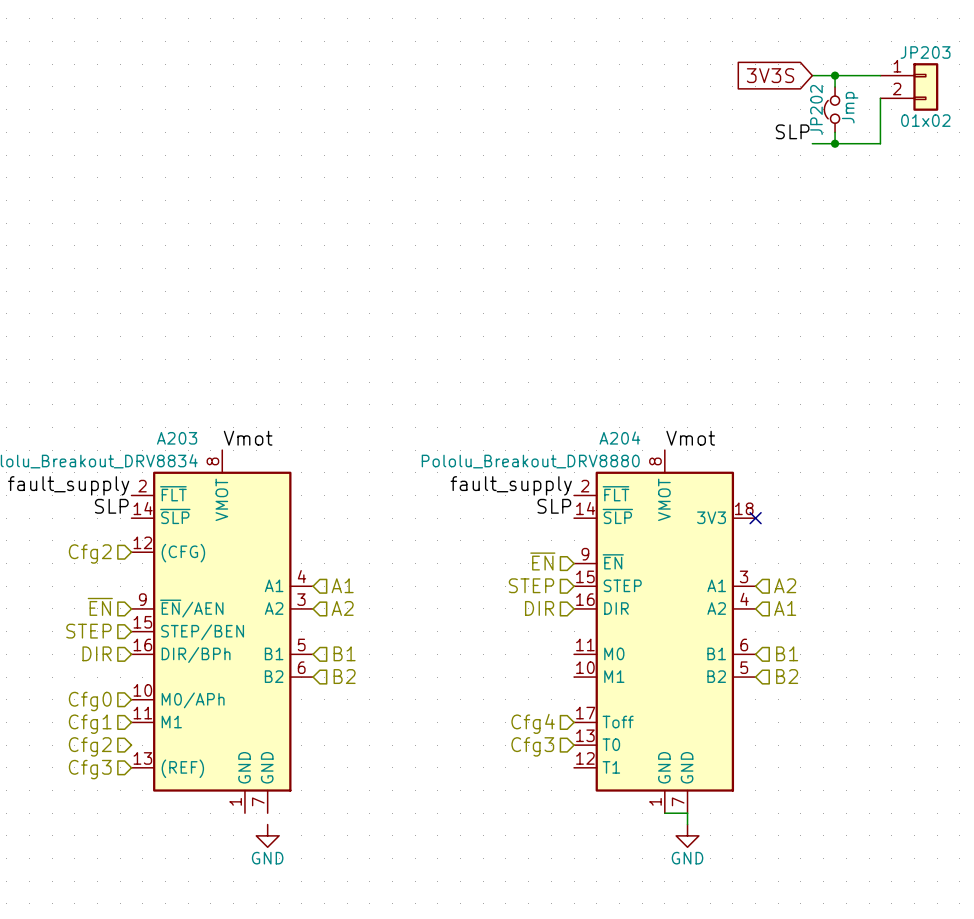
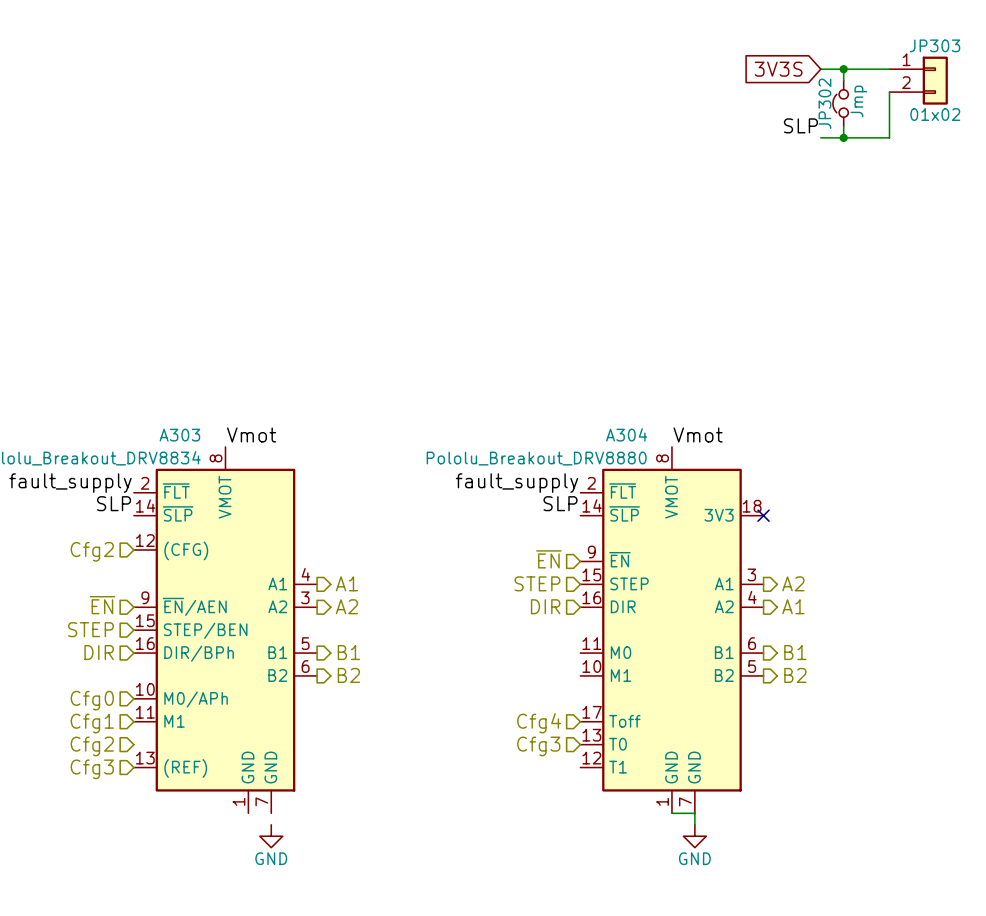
JP203 name: JP203 (925, 52) -> JP303 (935, 45)
JP202 name: JP202 (816, 109) -> JP302 (824, 103)
A203 name: A203 (177, 438) -> A303 (179, 435)
A204 name: A204 (619, 438) -> A304 (626, 434)
hierarchical label shape: input (342, 585) -> output (346, 583)
hierarchical label shape: input (785, 585) -> output (793, 583)
hierarchical label shape: input (342, 608) -> output (346, 606)
hierarchical label shape: input (785, 608) -> output (793, 606)
hierarchical label shape: input (344, 653) -> output (348, 652)
hierarchical label shape: input (787, 653) -> output (795, 652)
hierarchical label shape: input (344, 676) -> output (348, 675)
hierarchical label shape: input (787, 676) -> output (795, 675)

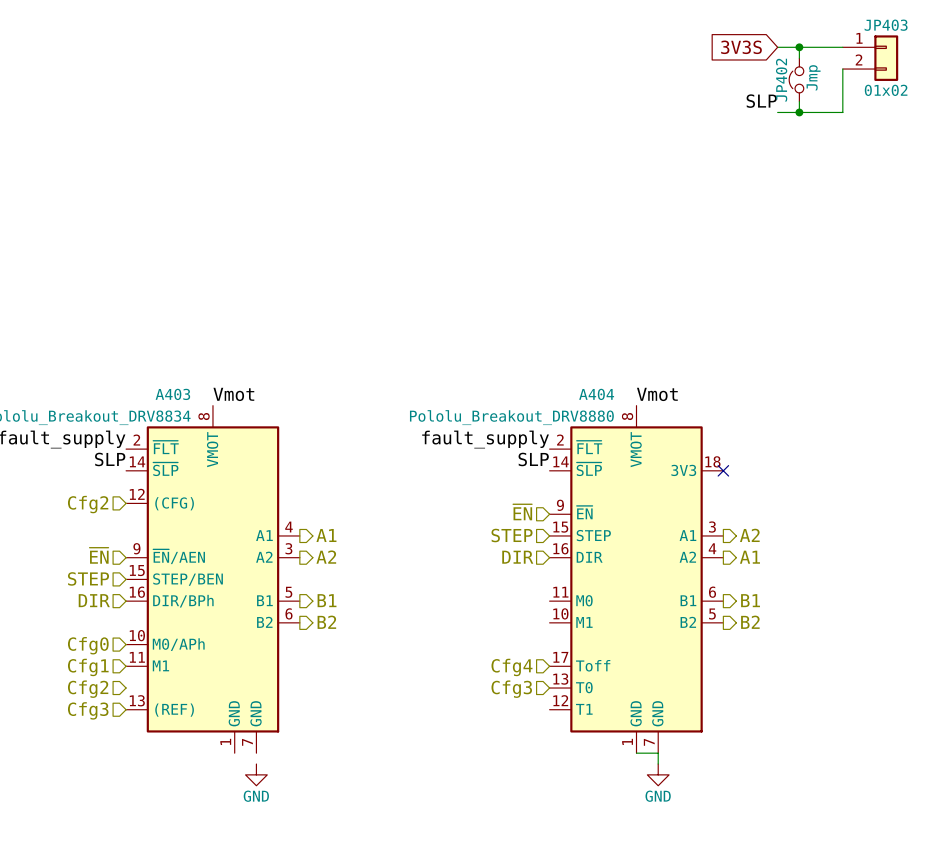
JP303 name: JP303 (935, 45) -> JP403 (886, 25)
JP302 name: JP302 (824, 103) -> JP402 (781, 80)
A304 name: A304 (626, 434) -> A404 (596, 394)
A303 name: A303 (179, 435) -> A403 (172, 394)

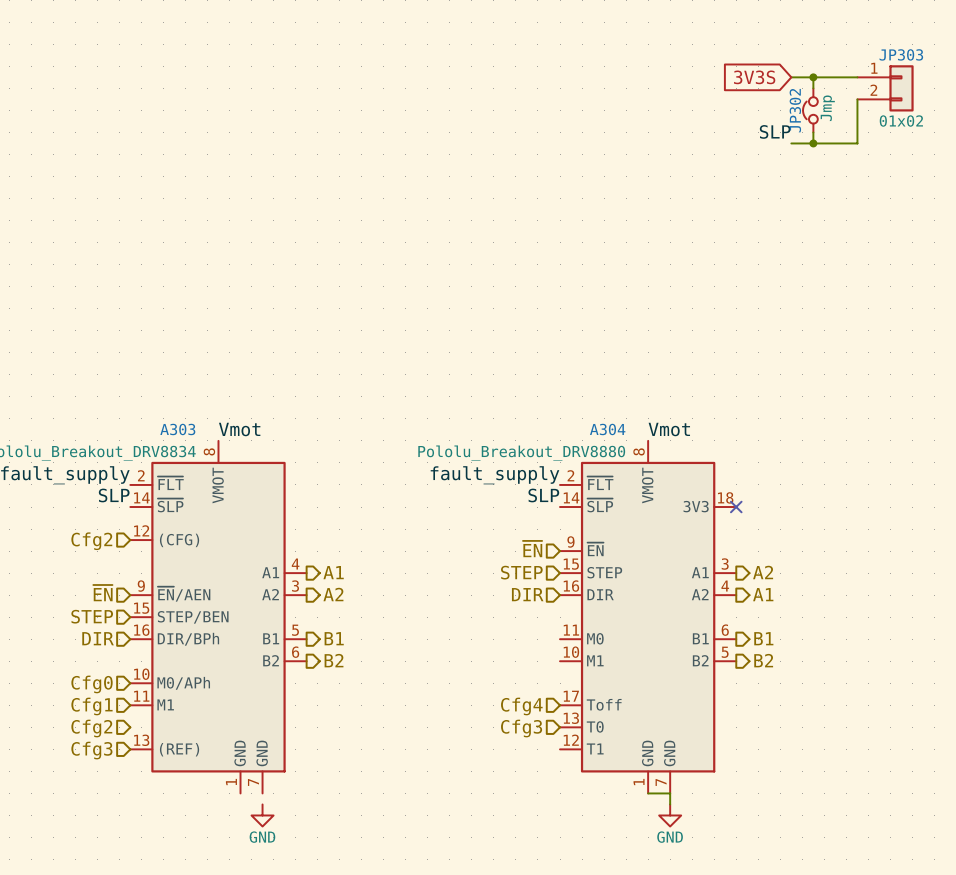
JP403 name: JP403 (886, 25) -> JP303 (901, 54)
JP402 name: JP402 (781, 80) -> JP302 (795, 110)
A403 name: A403 (172, 394) -> A303 (177, 429)
A404 name: A404 (596, 394) -> A304 (607, 429)

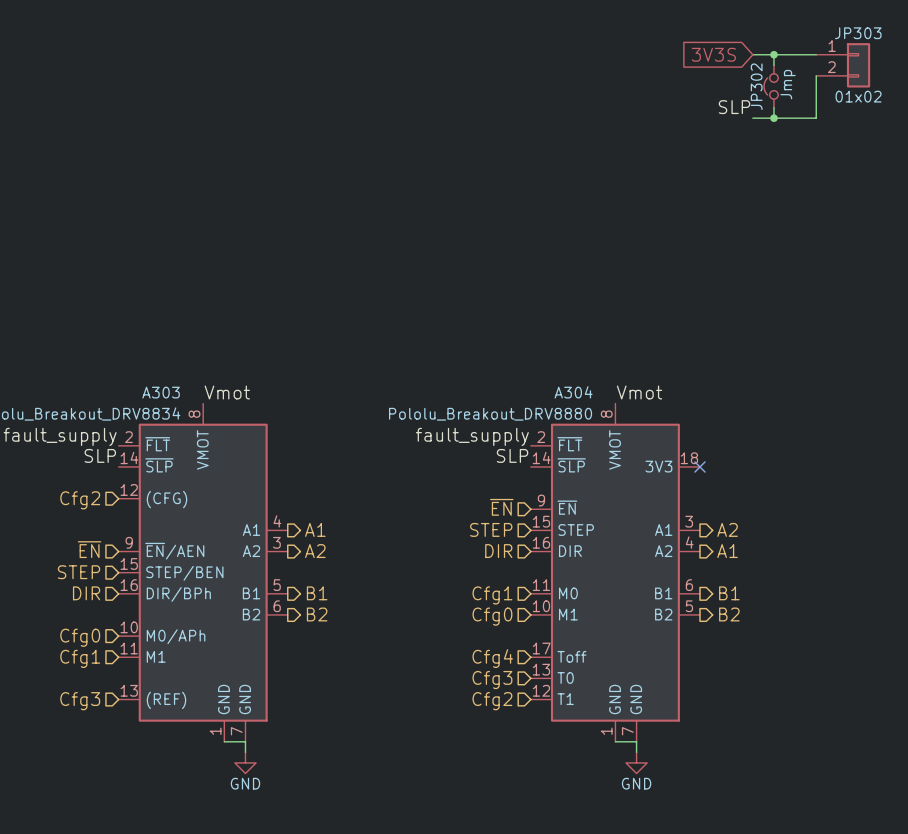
hierarchical label: none -> Cfg1 (492, 595)
hierarchical label: none -> Cfg0 (492, 616)
hierarchical label: Cfg2 (91, 728) -> none
hierarchical label: none -> Cfg2 (492, 701)
wire: none -> (224, 741) (245, 741) (245, 752)

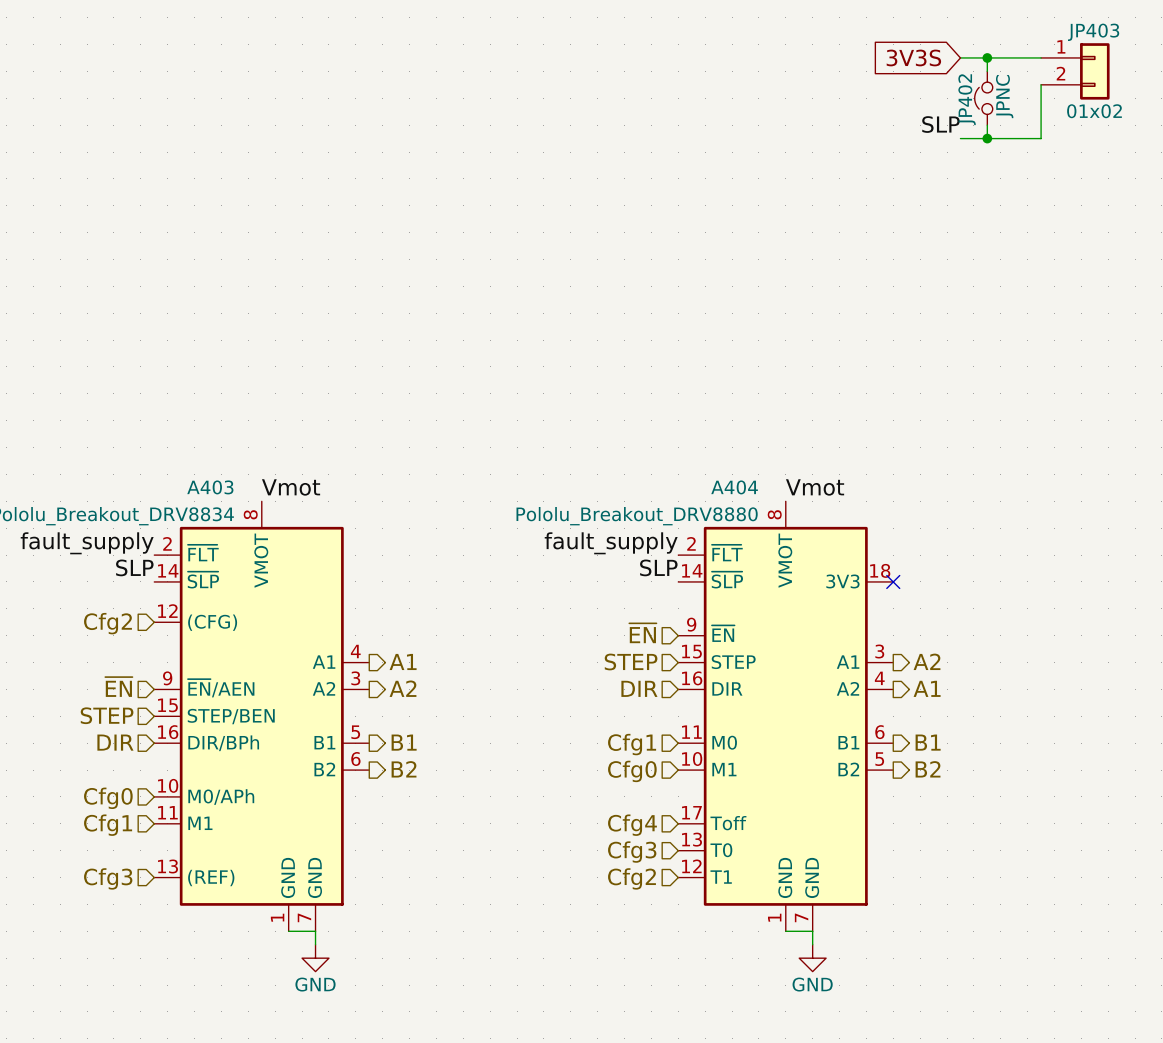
JP303 name: JP303 (858, 33) -> JP403 (1093, 32)
JP302 value: Jmp (788, 84) -> JPNC (1004, 96)
JP302 name: JP302 (756, 86) -> JP402 (967, 99)
A303 name: A303 (161, 392) -> A403 (210, 487)
A304 name: A304 (573, 392) -> A404 (734, 487)

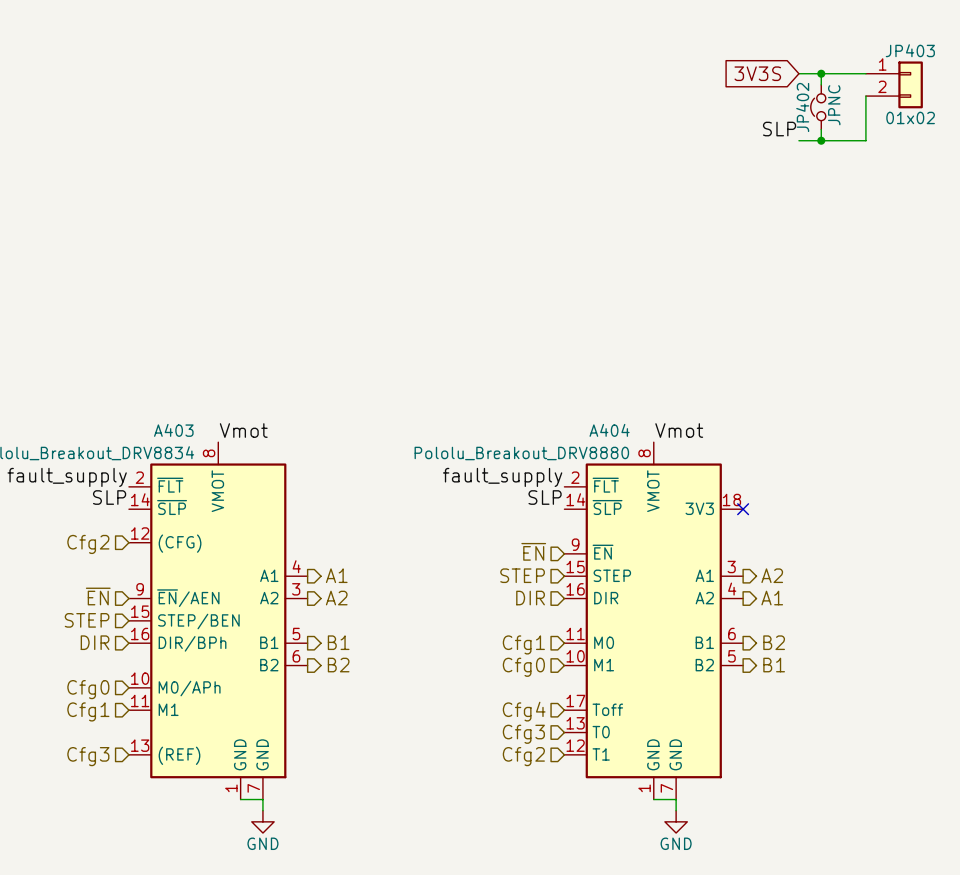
hierarchical label: B1 (928, 742) -> B2 (774, 642)
hierarchical label: B2 (928, 769) -> B1 (774, 665)

